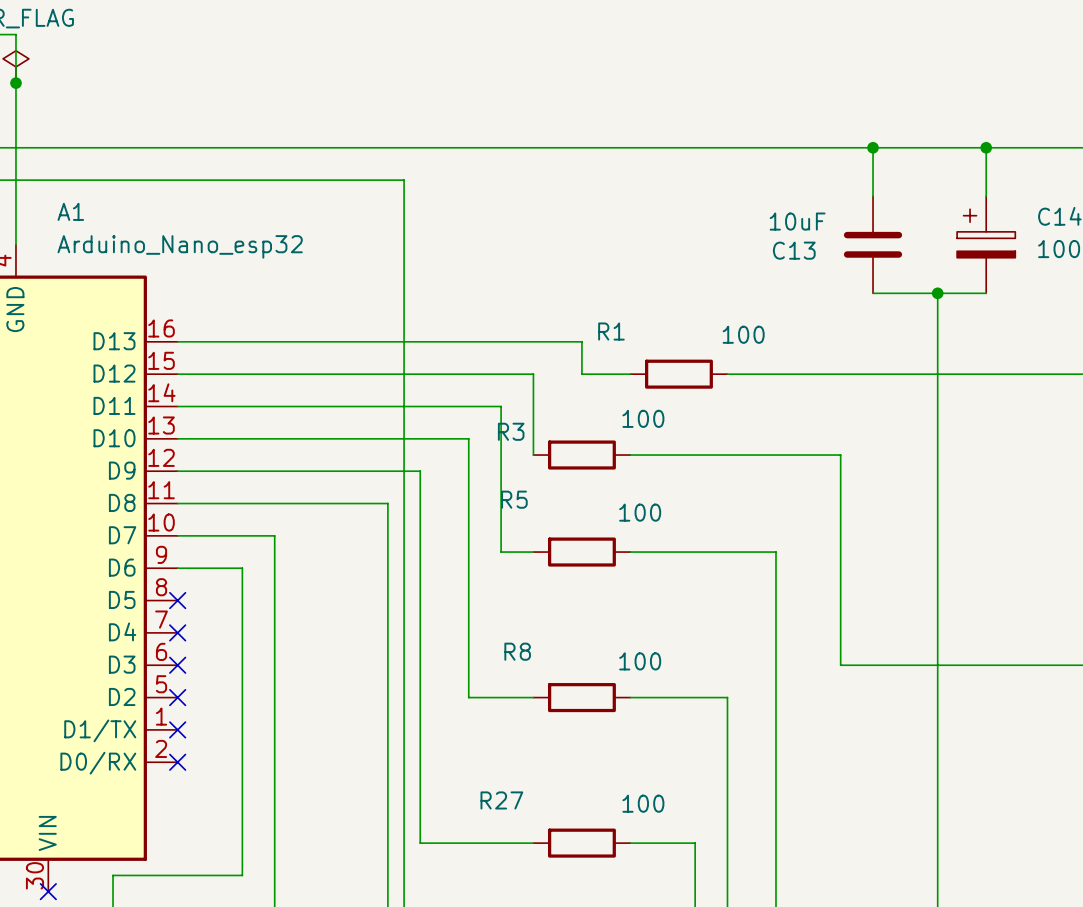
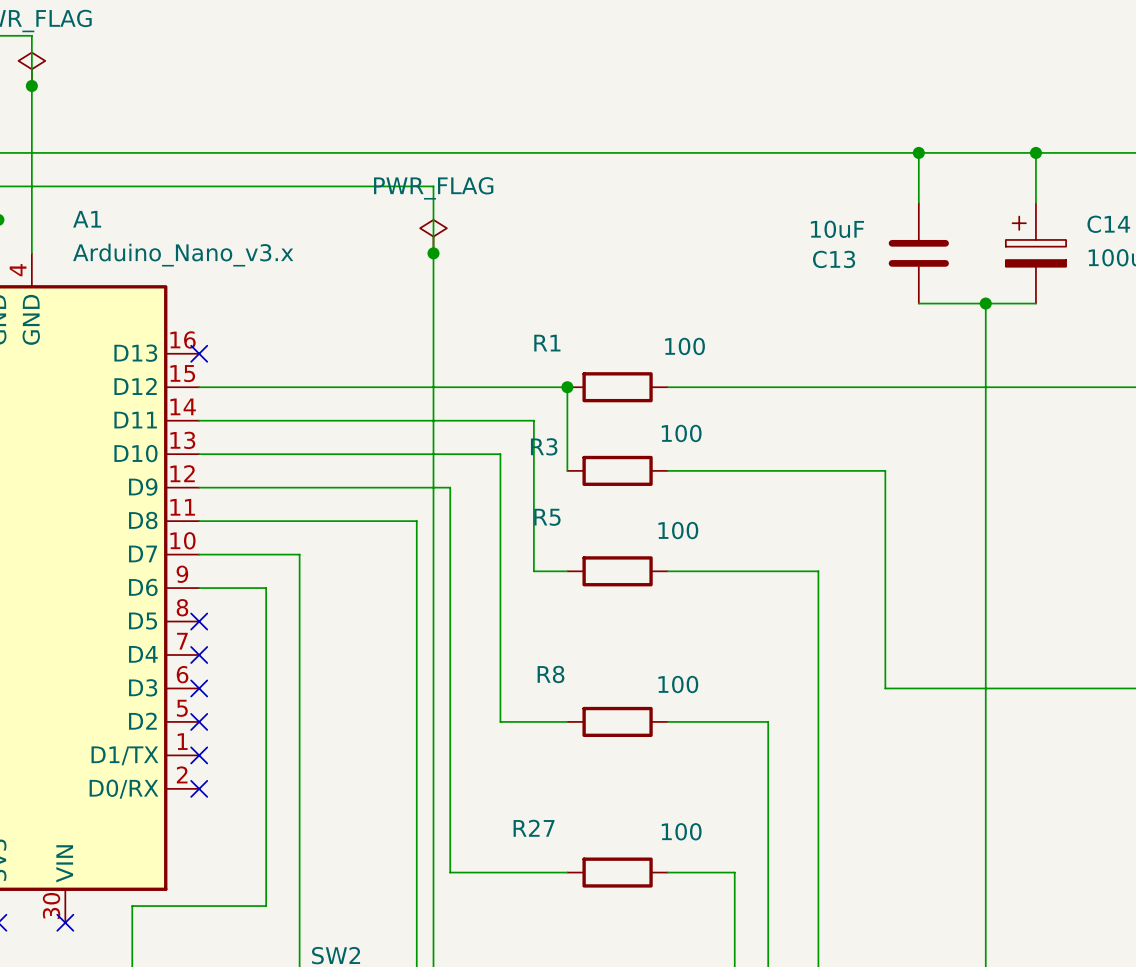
power symbol: none -> PWR_FLAG (433, 236)
junction: none -> (433, 253)
A1 value: Arduino_Nano_esp32 (180, 246) -> Arduino_Nano_v3.x (183, 255)
wire: (177, 341) (581, 341) (581, 374) (630, 374) -> (768, 387) (667, 387)
no-connect mark: none -> (199, 353)
junction: none -> (567, 387)
R1 position: (678, 374) -> (617, 387)

